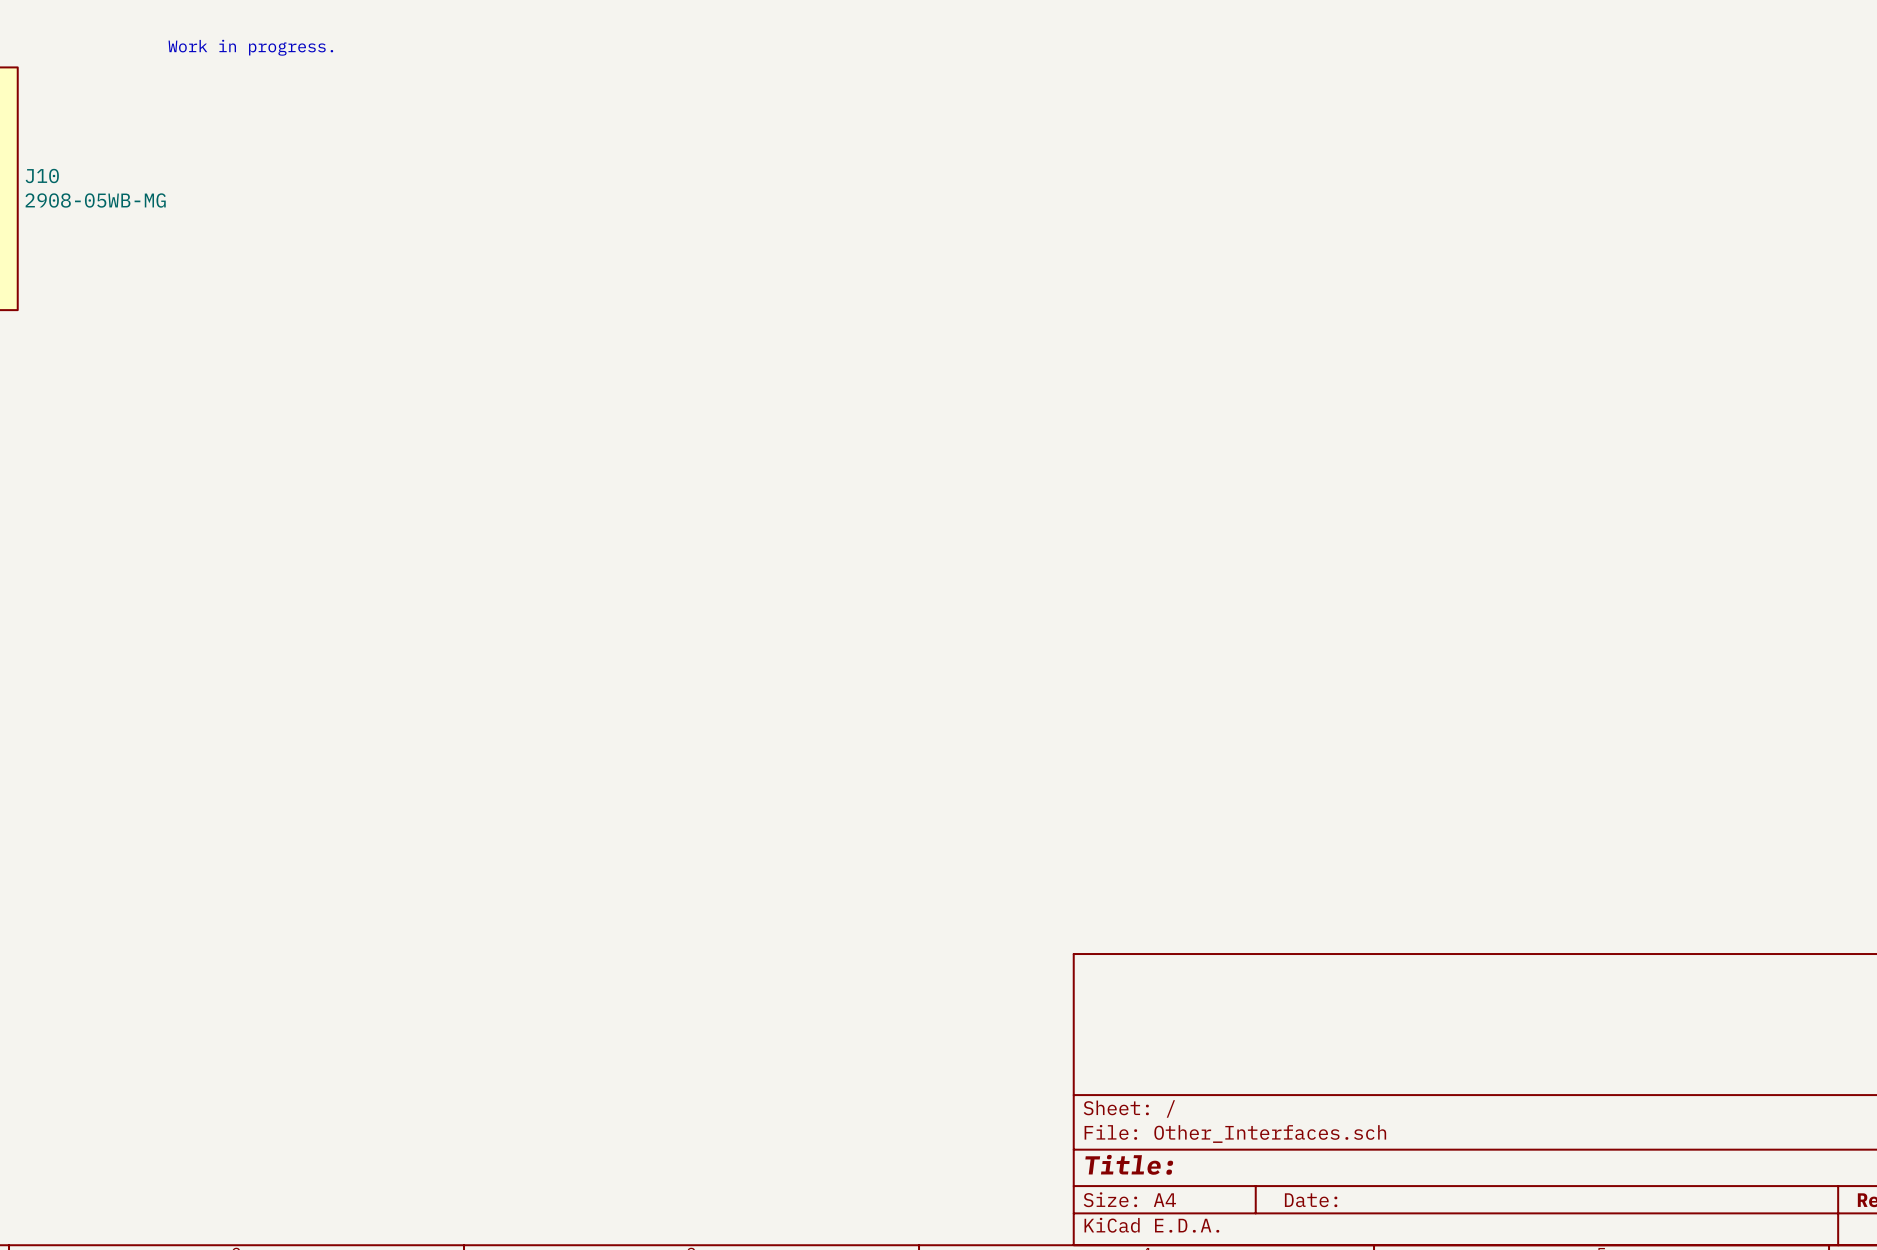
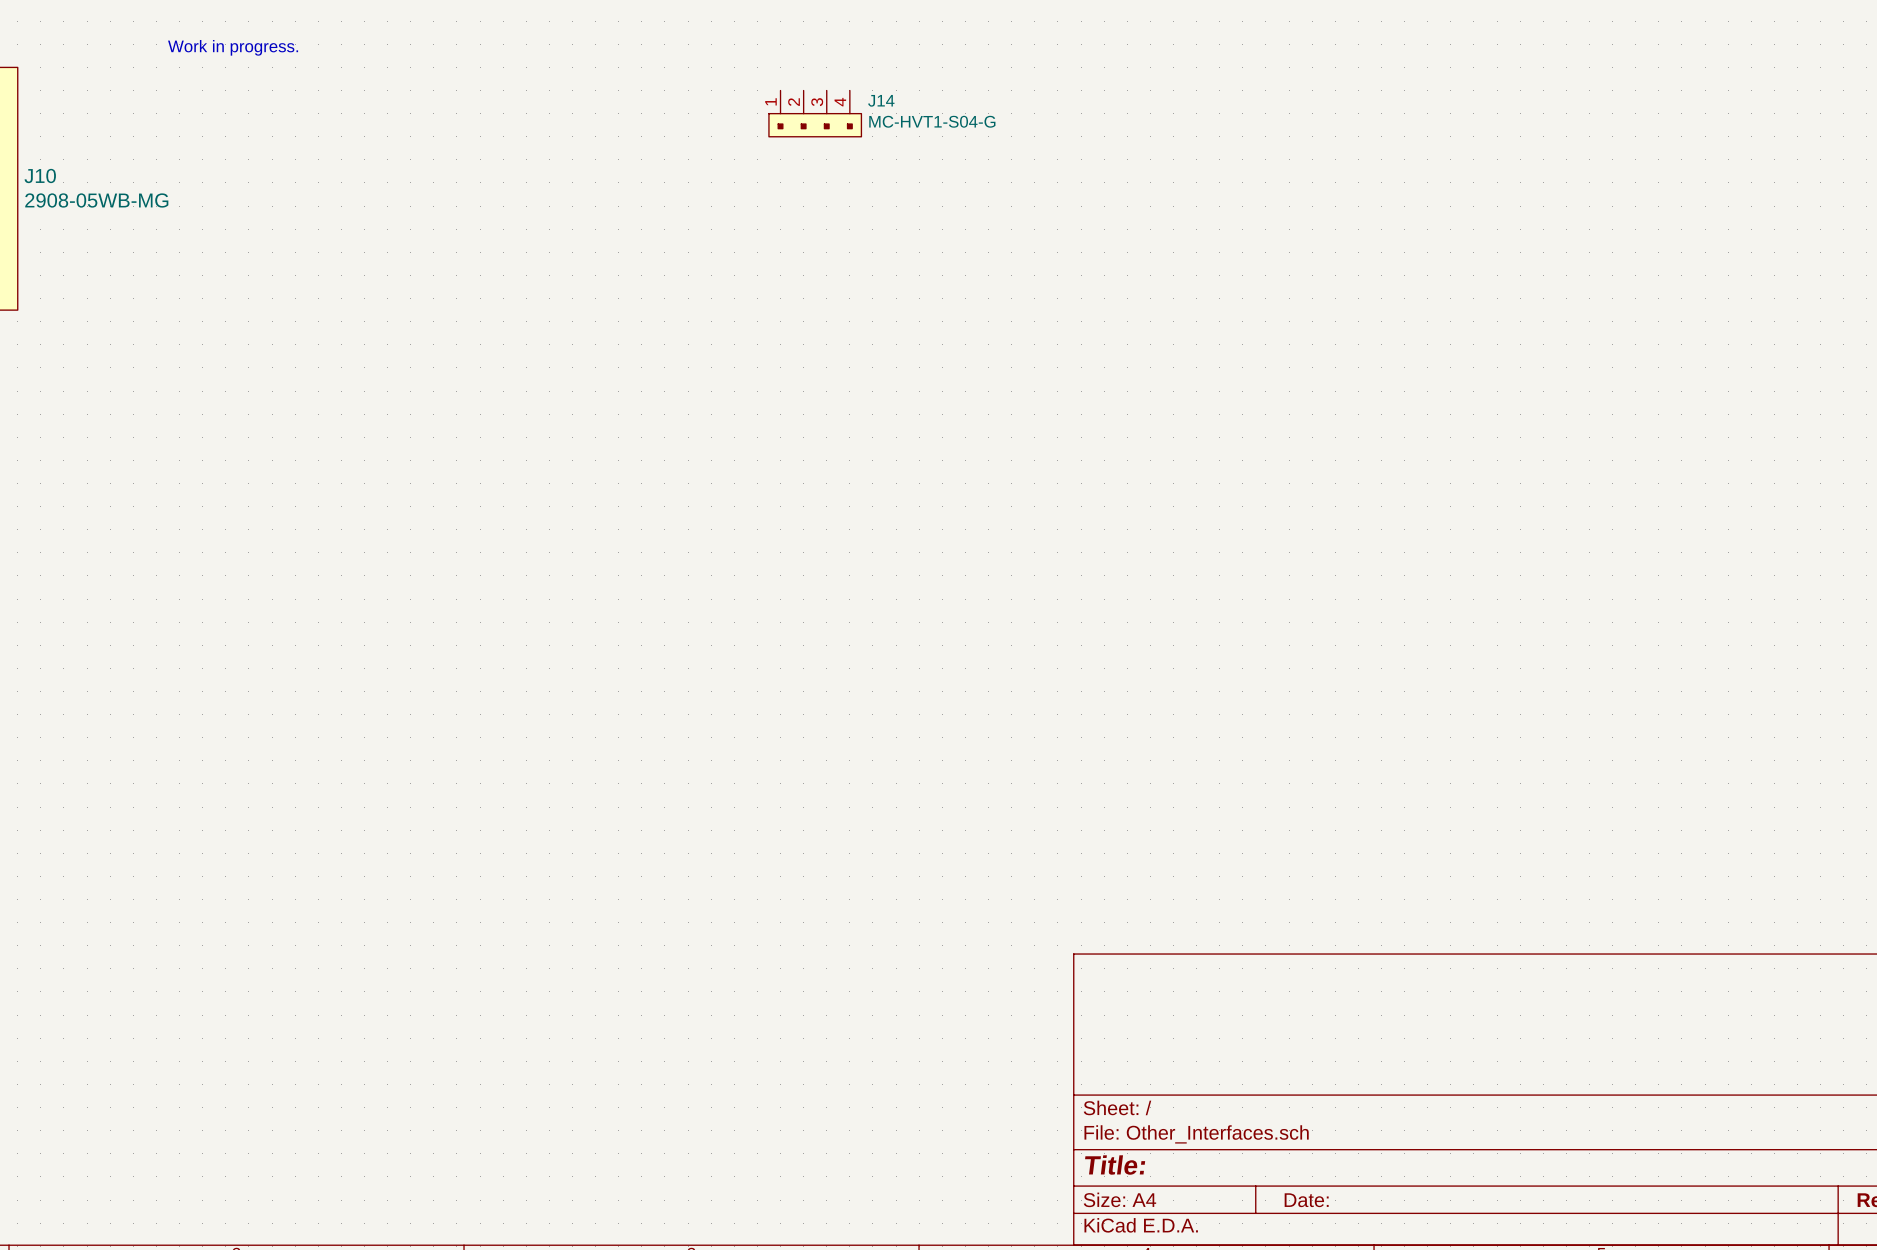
J14: none -> MC-HVT1-S04-G (815, 113)

